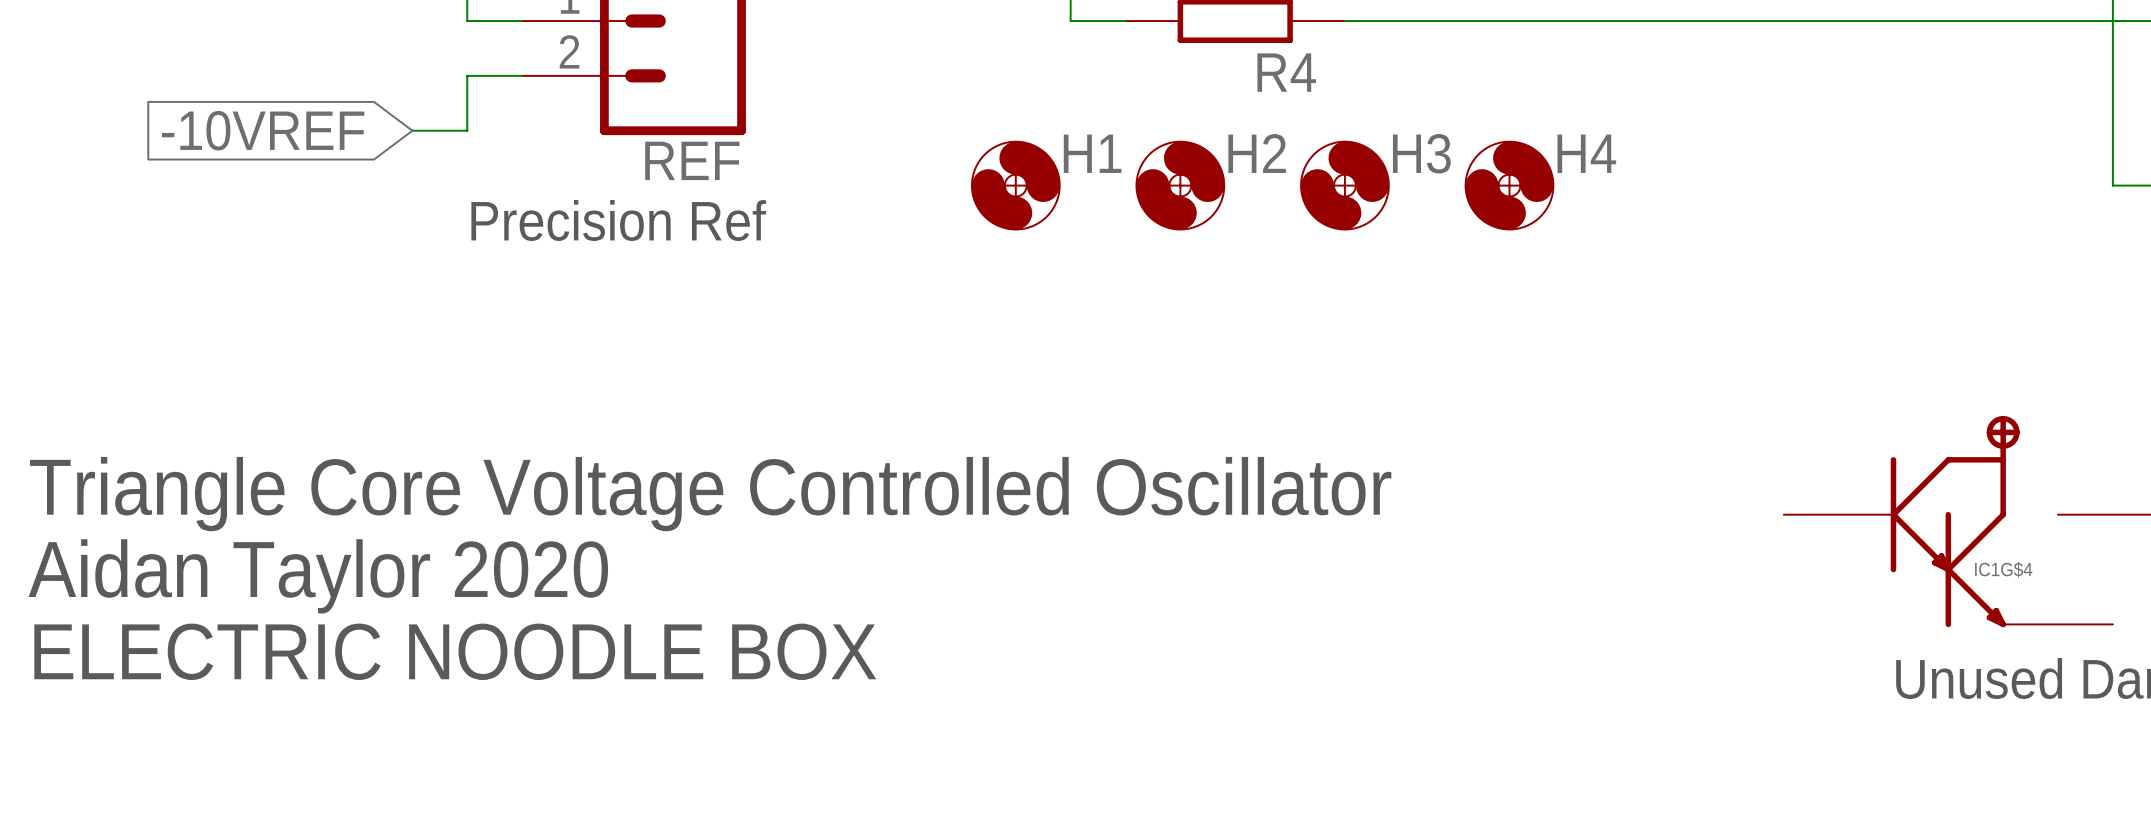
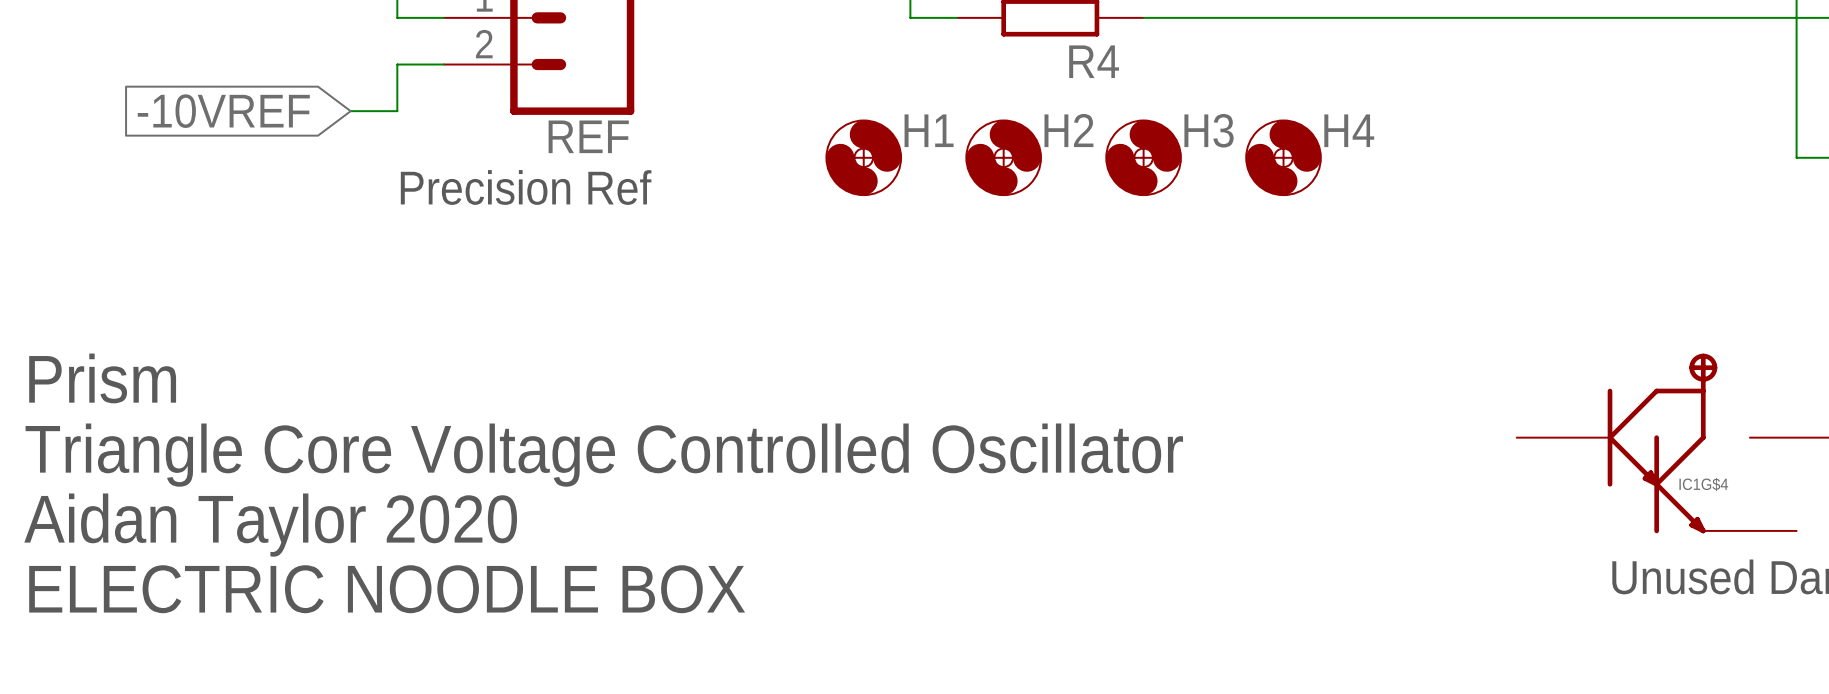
text: none -> Prism (102, 378)
text position: Triangle Core Voltage Controlled Oscillator (710, 494) -> Triangle Core Voltage Controlled Oscillator (604, 455)
text position: Aidan Taylor 2020 (318, 576) -> Aidan Taylor 2020 (270, 525)
text position: ELECTRIC NOODLE BOX (455, 651) -> ELECTRIC NOODLE BOX (387, 589)

